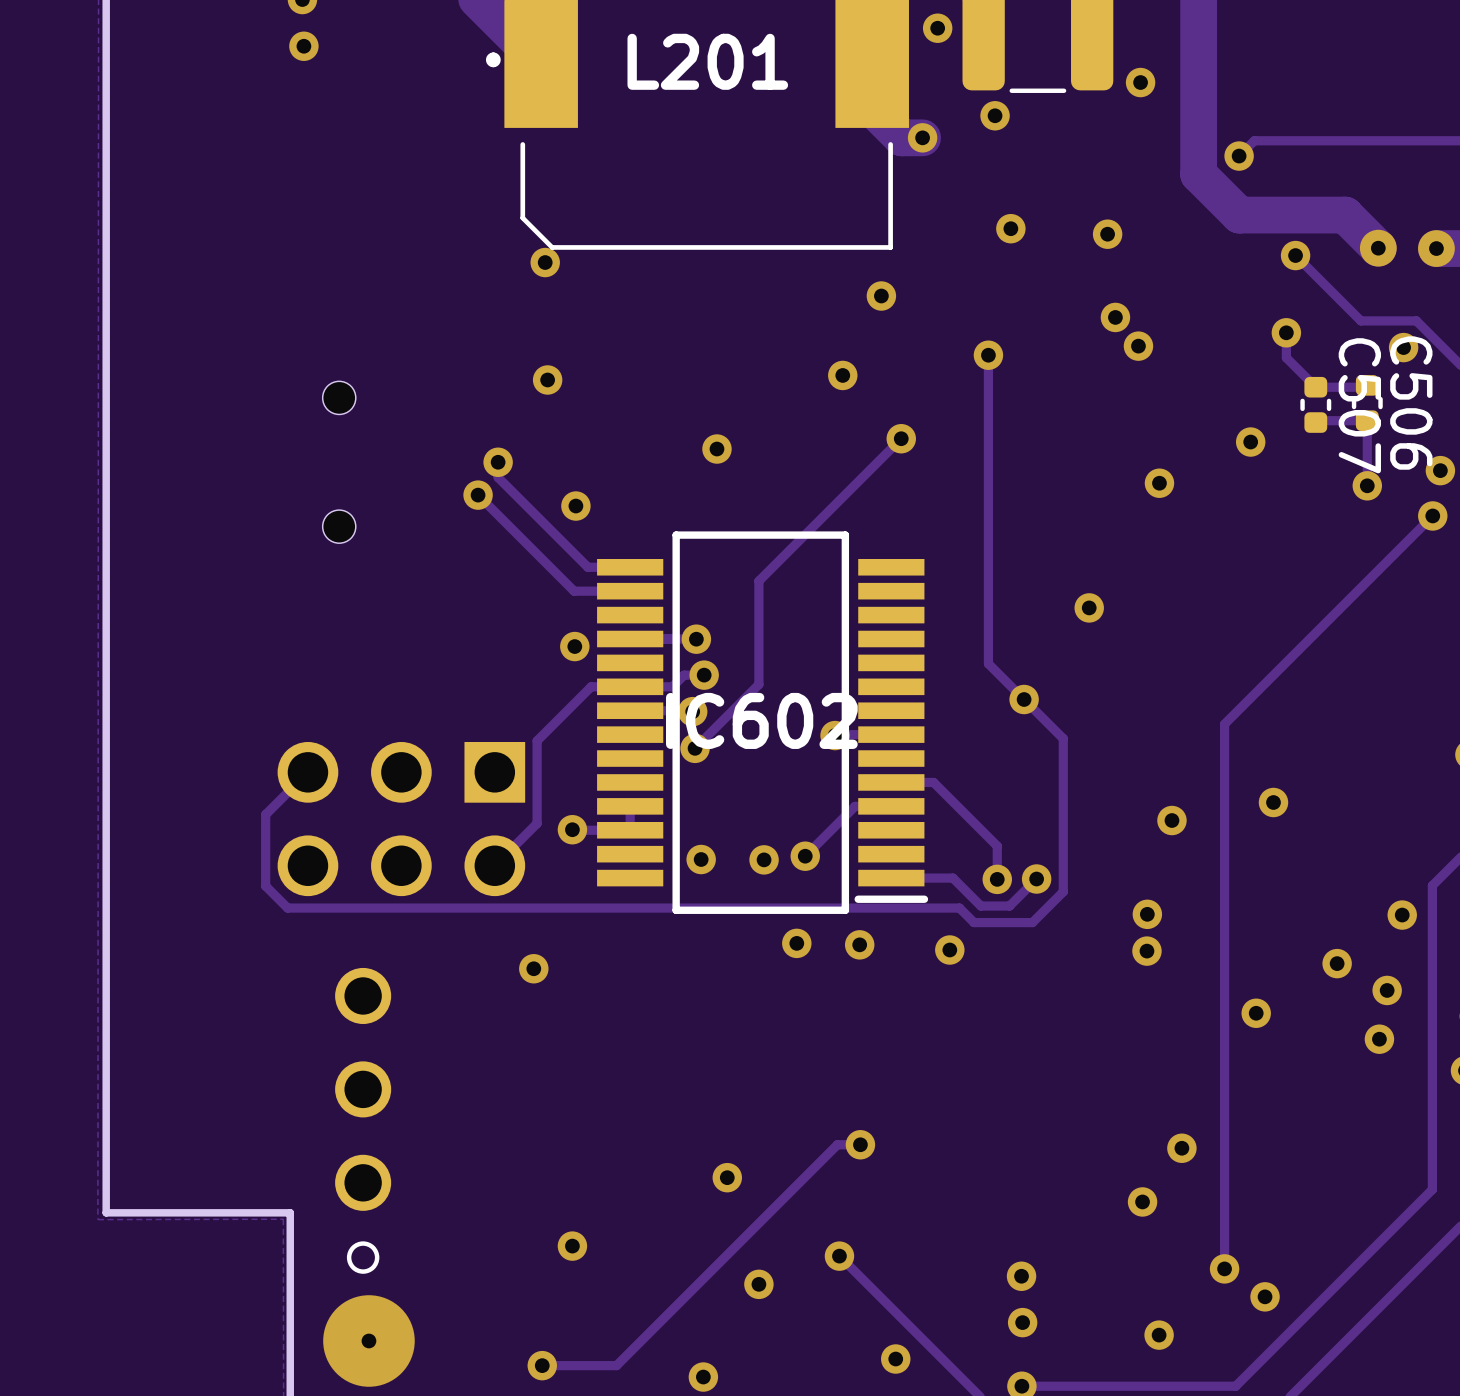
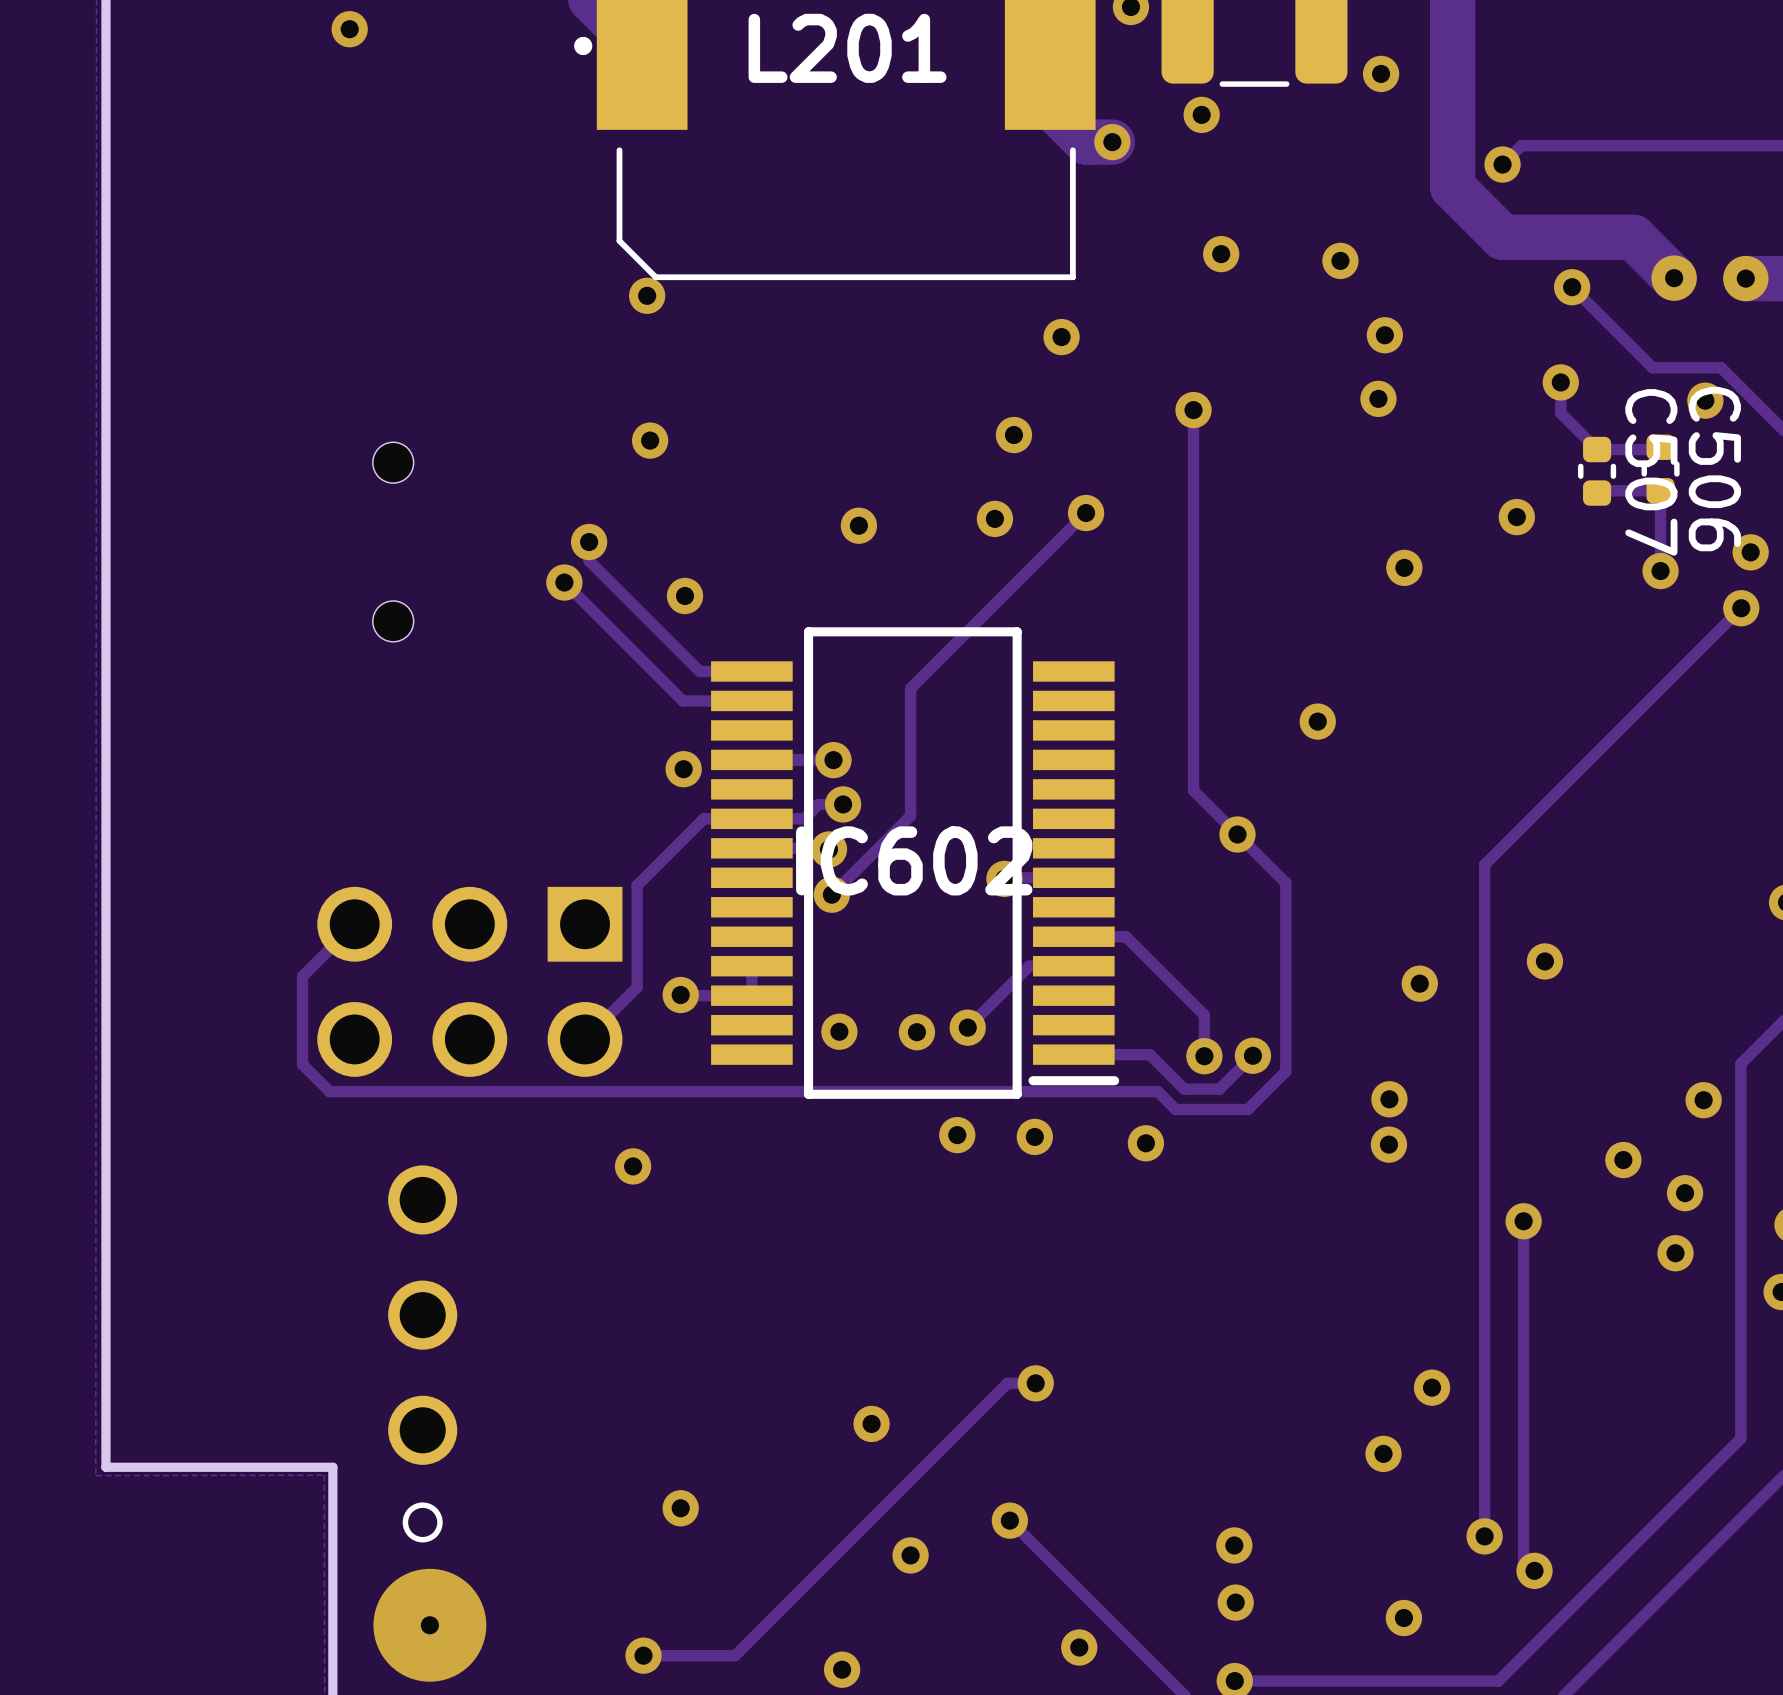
via position: (1115, 317) -> (1384, 335)
via: none -> (994, 518)
track: none -> (1523, 1221) (1523, 1559) (1534, 1570)

